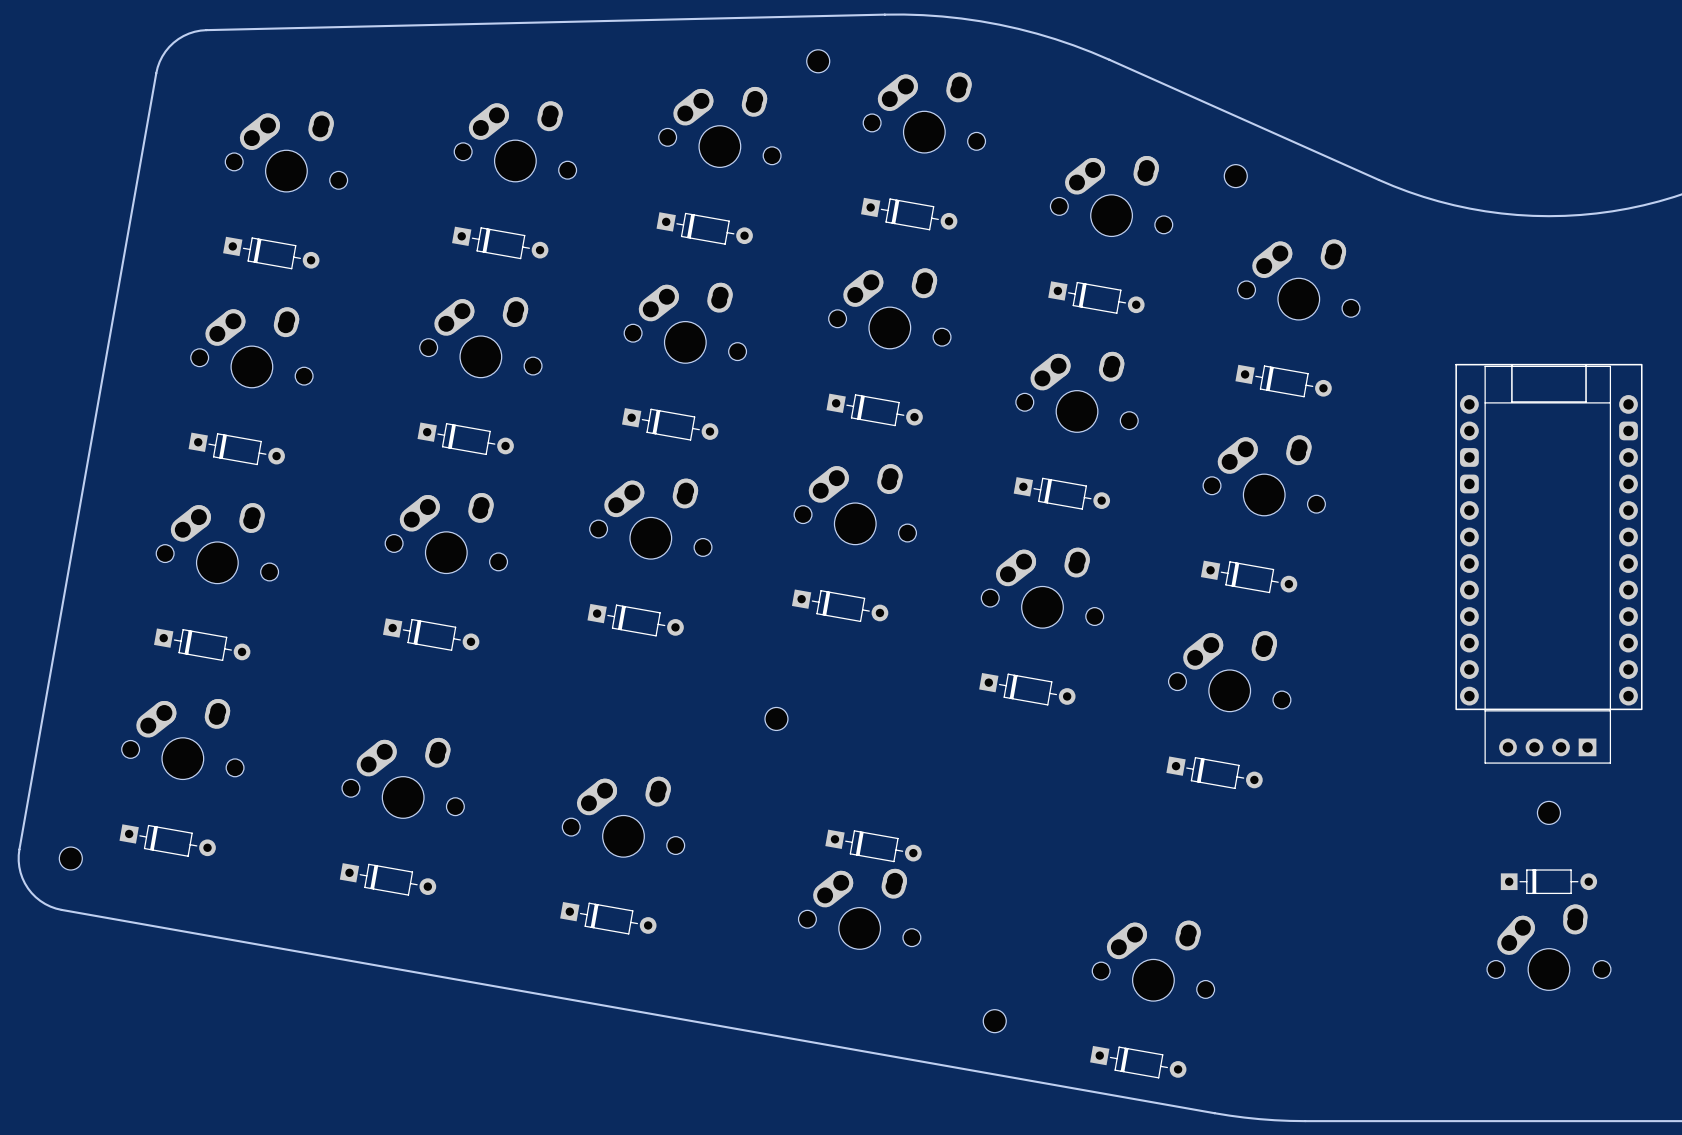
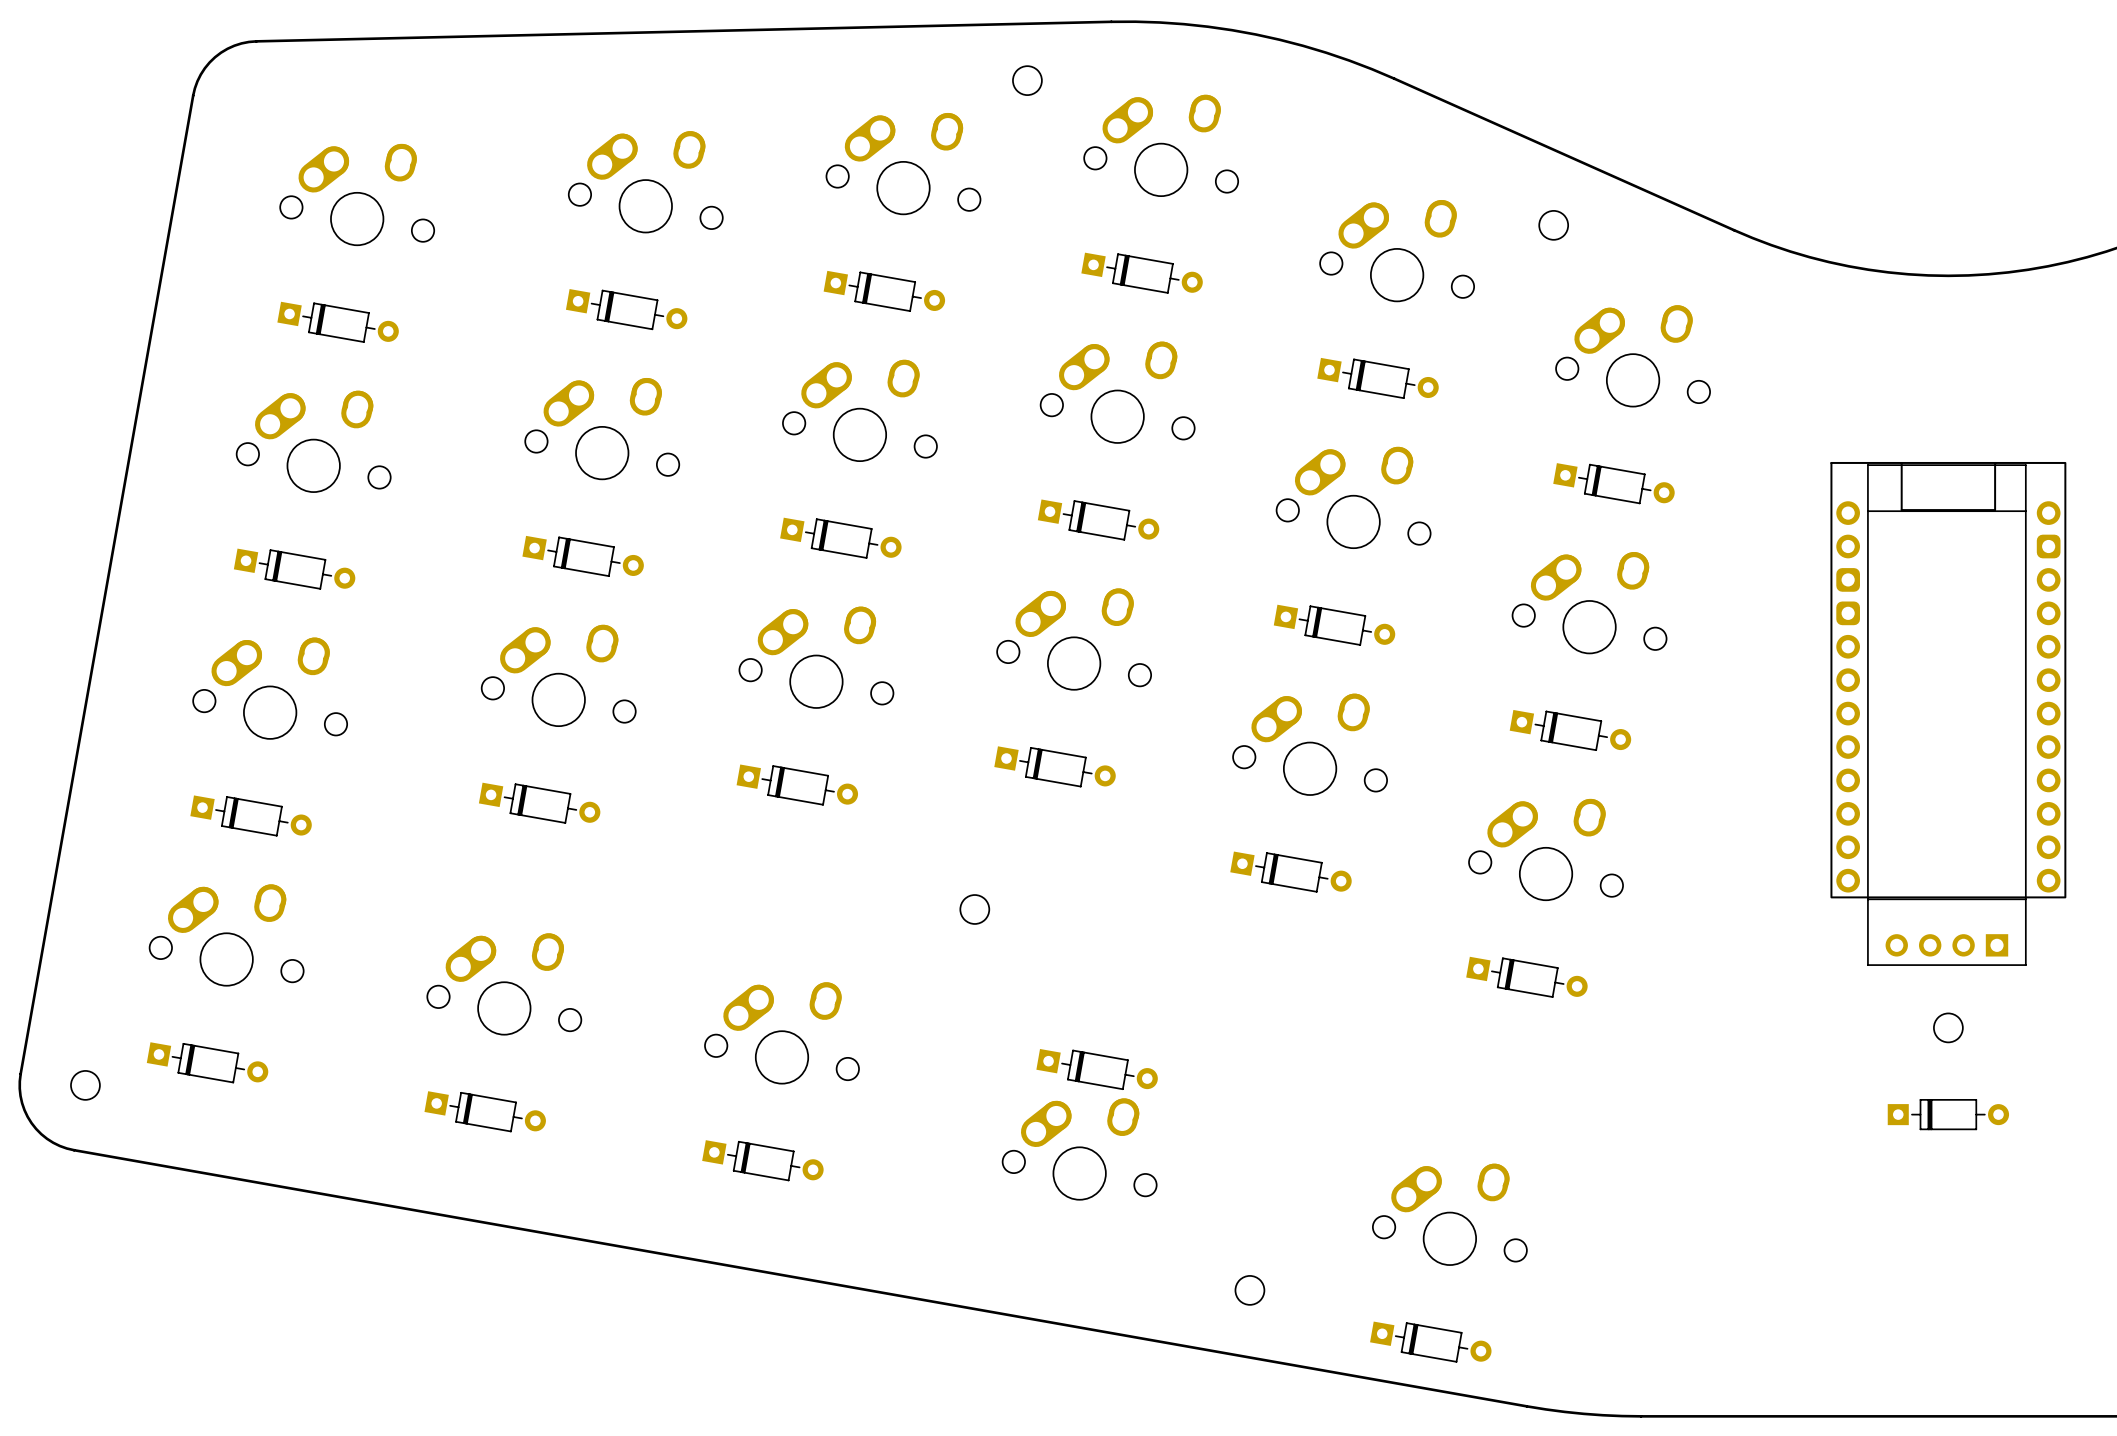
part: (1548, 947) -> none

